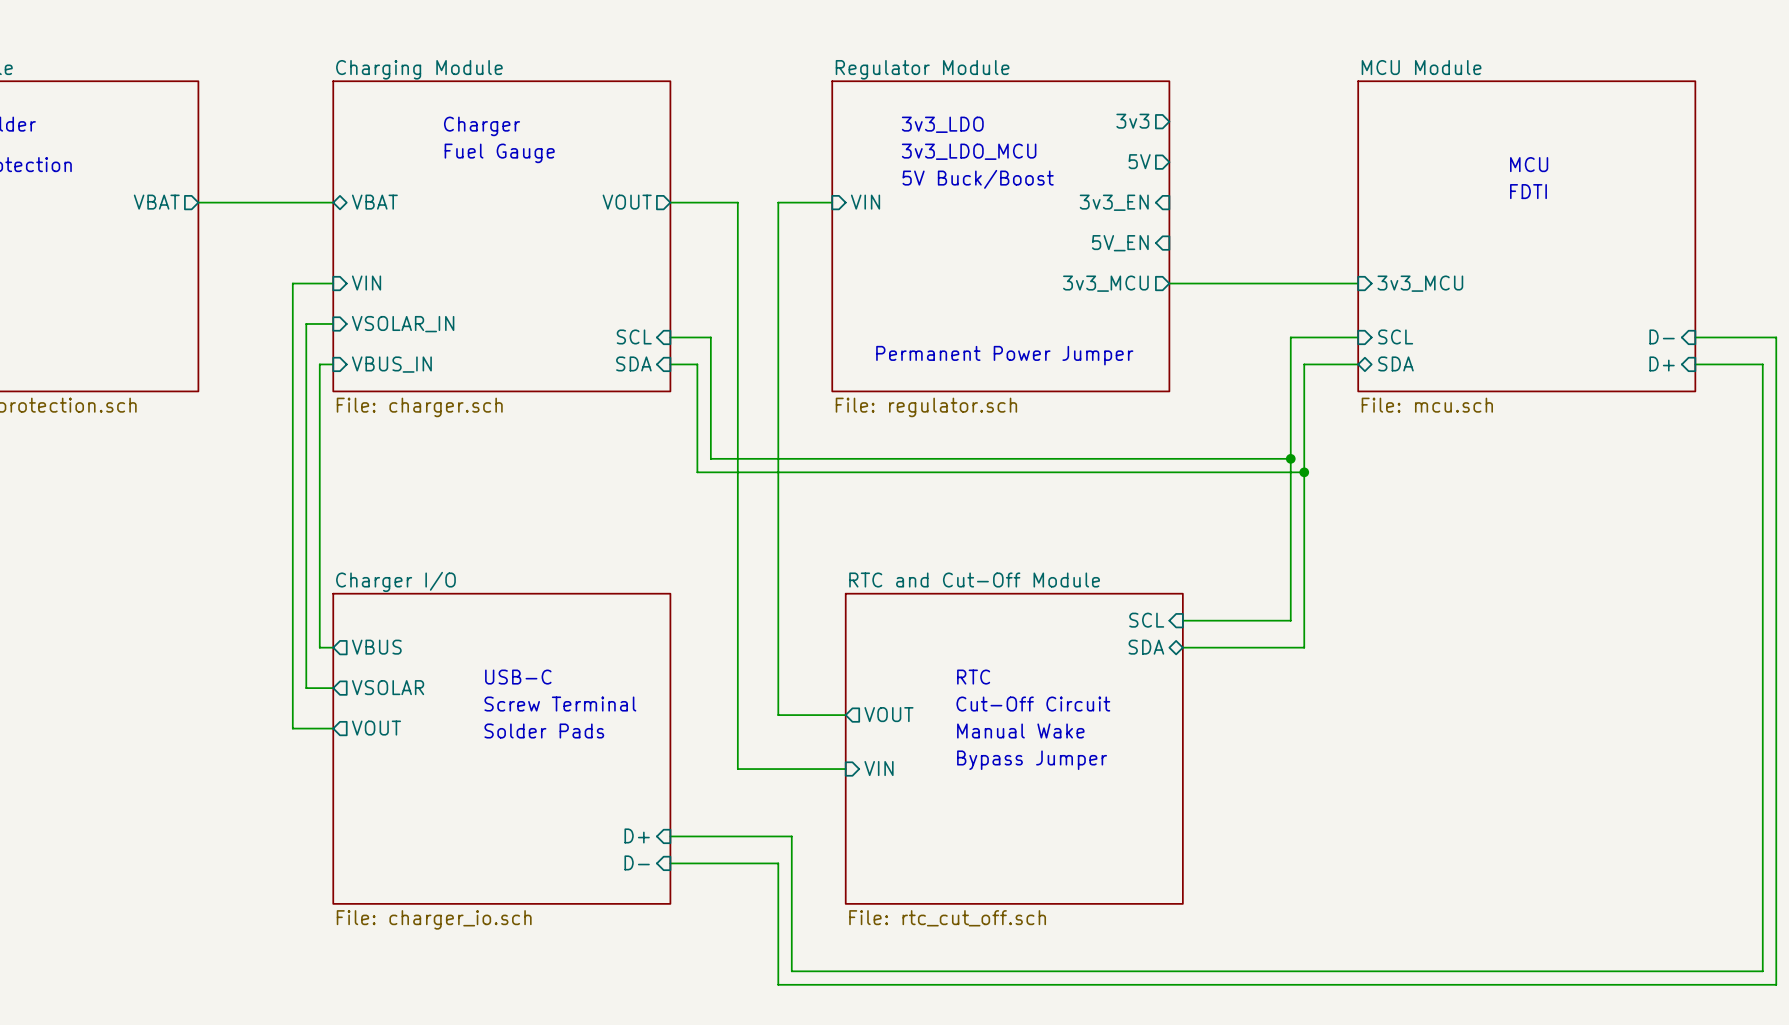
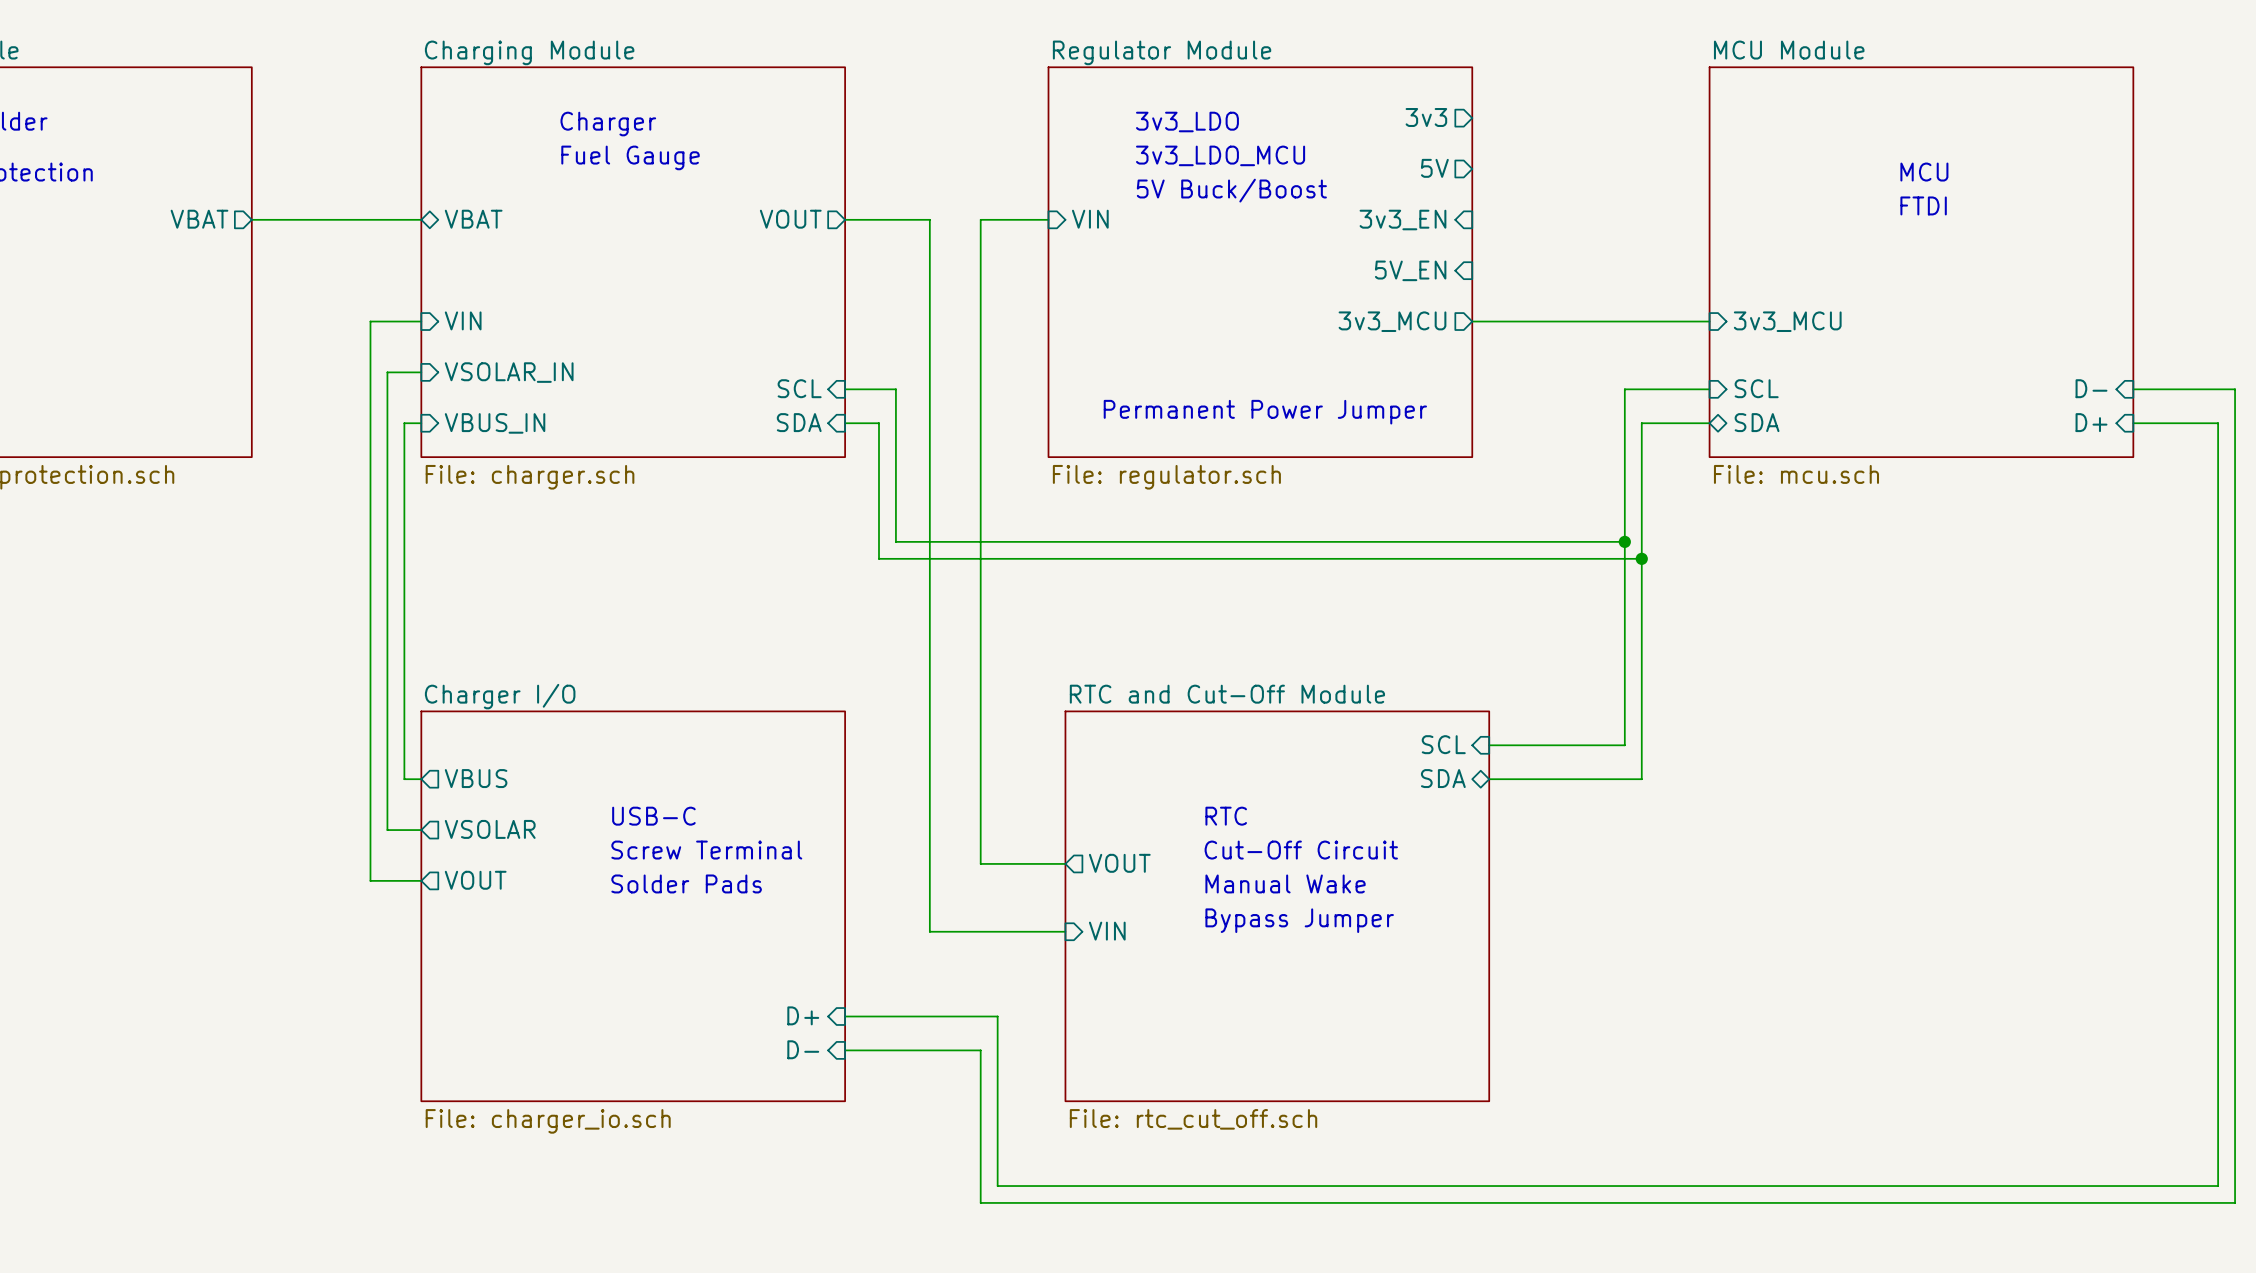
text: FDTI (1528, 191) -> FTDI (1923, 205)

